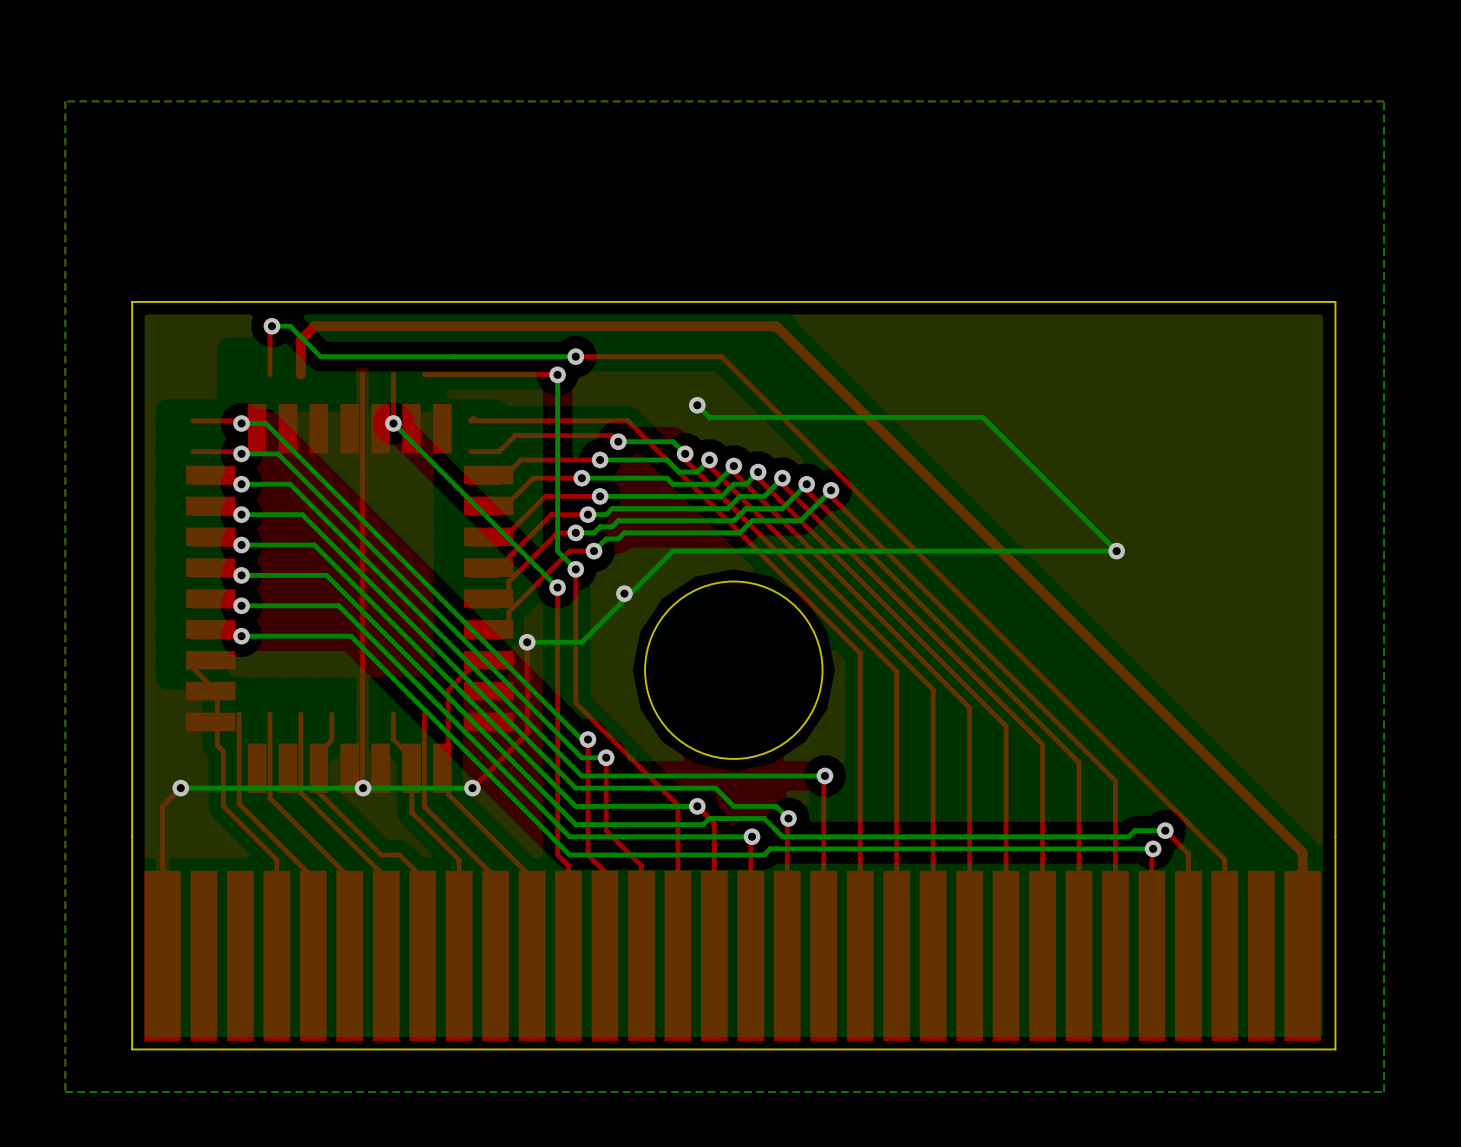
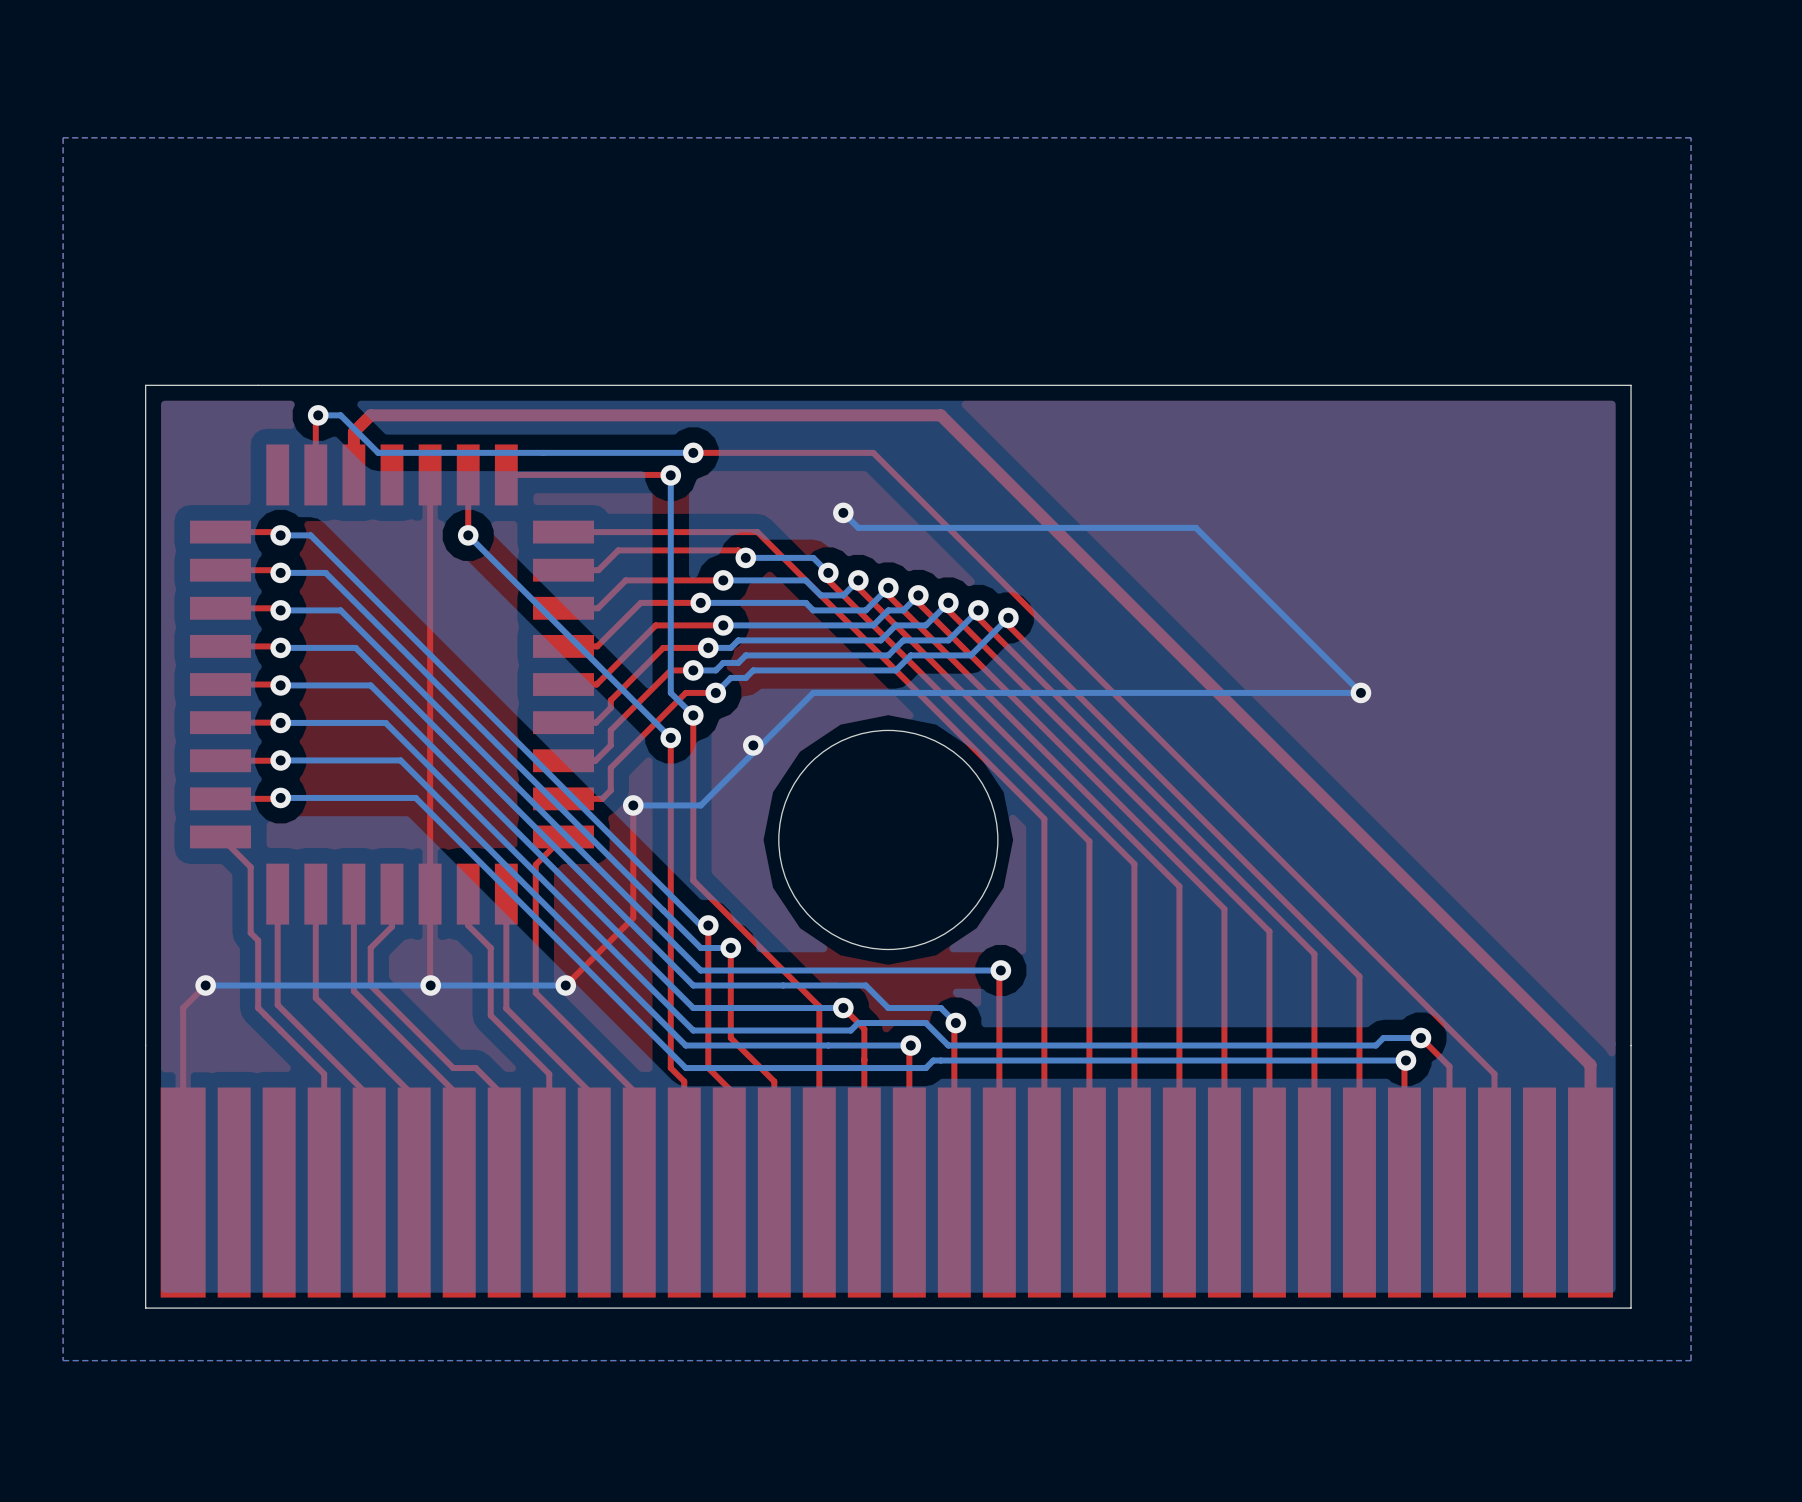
part position: (349, 598) -> (392, 684)

